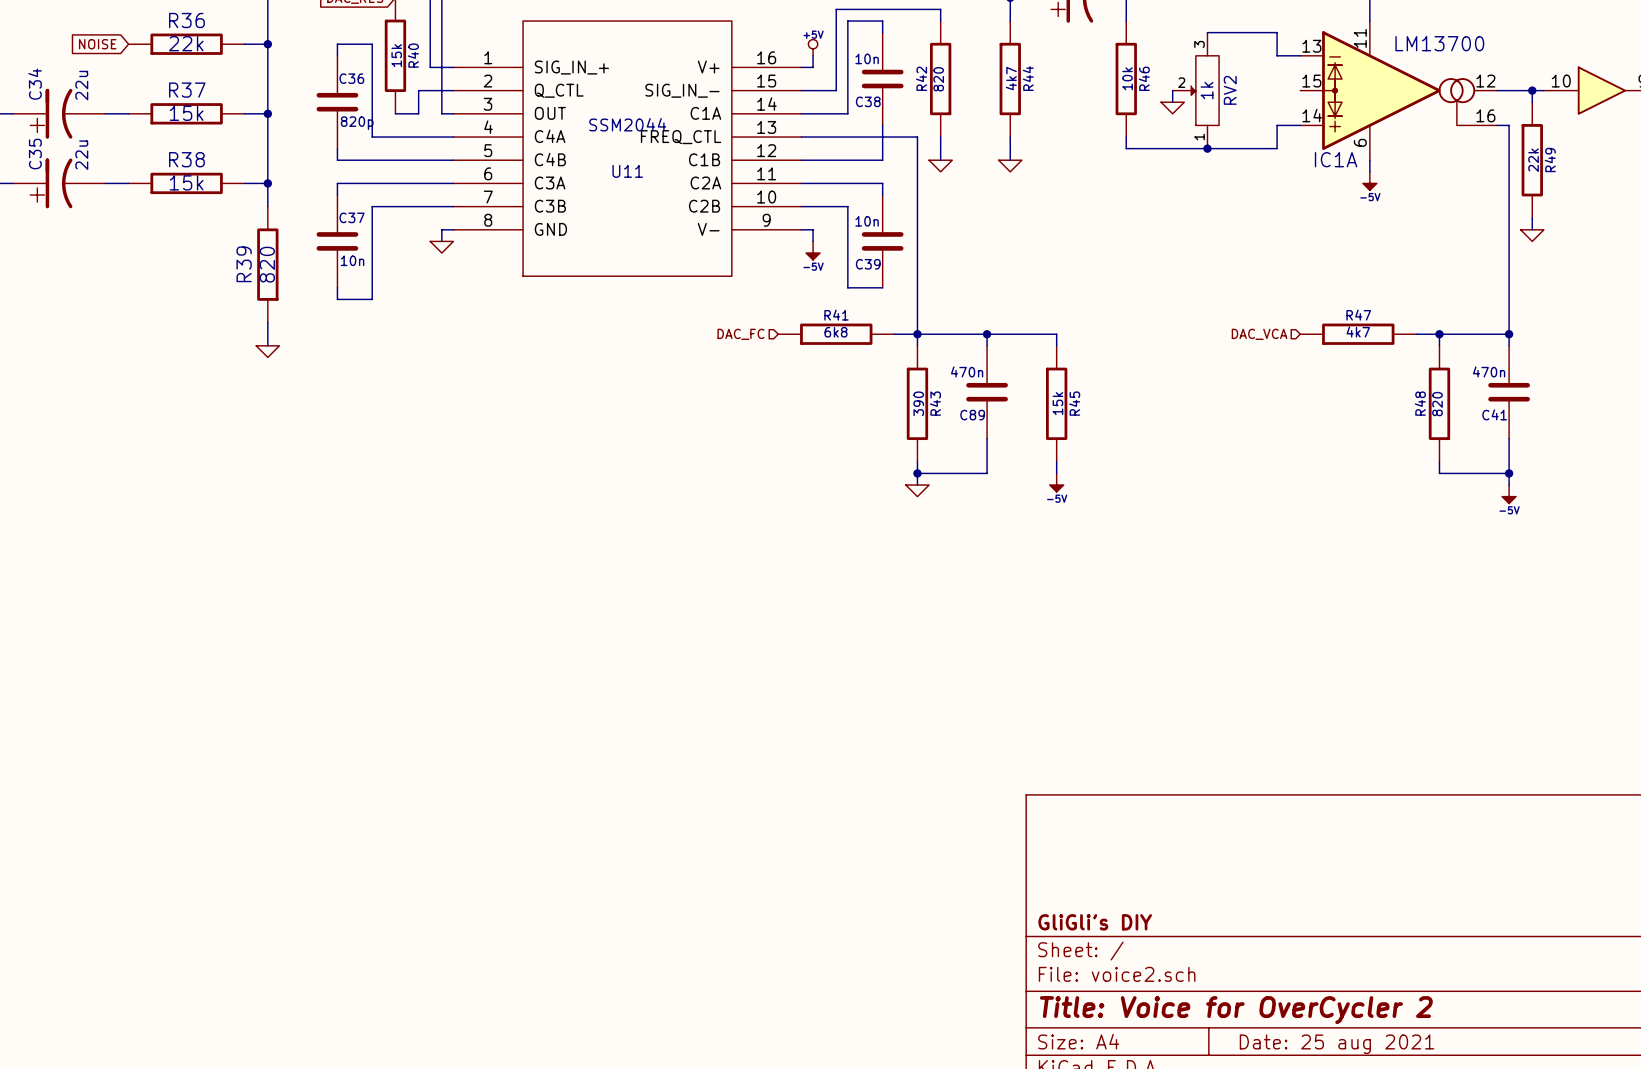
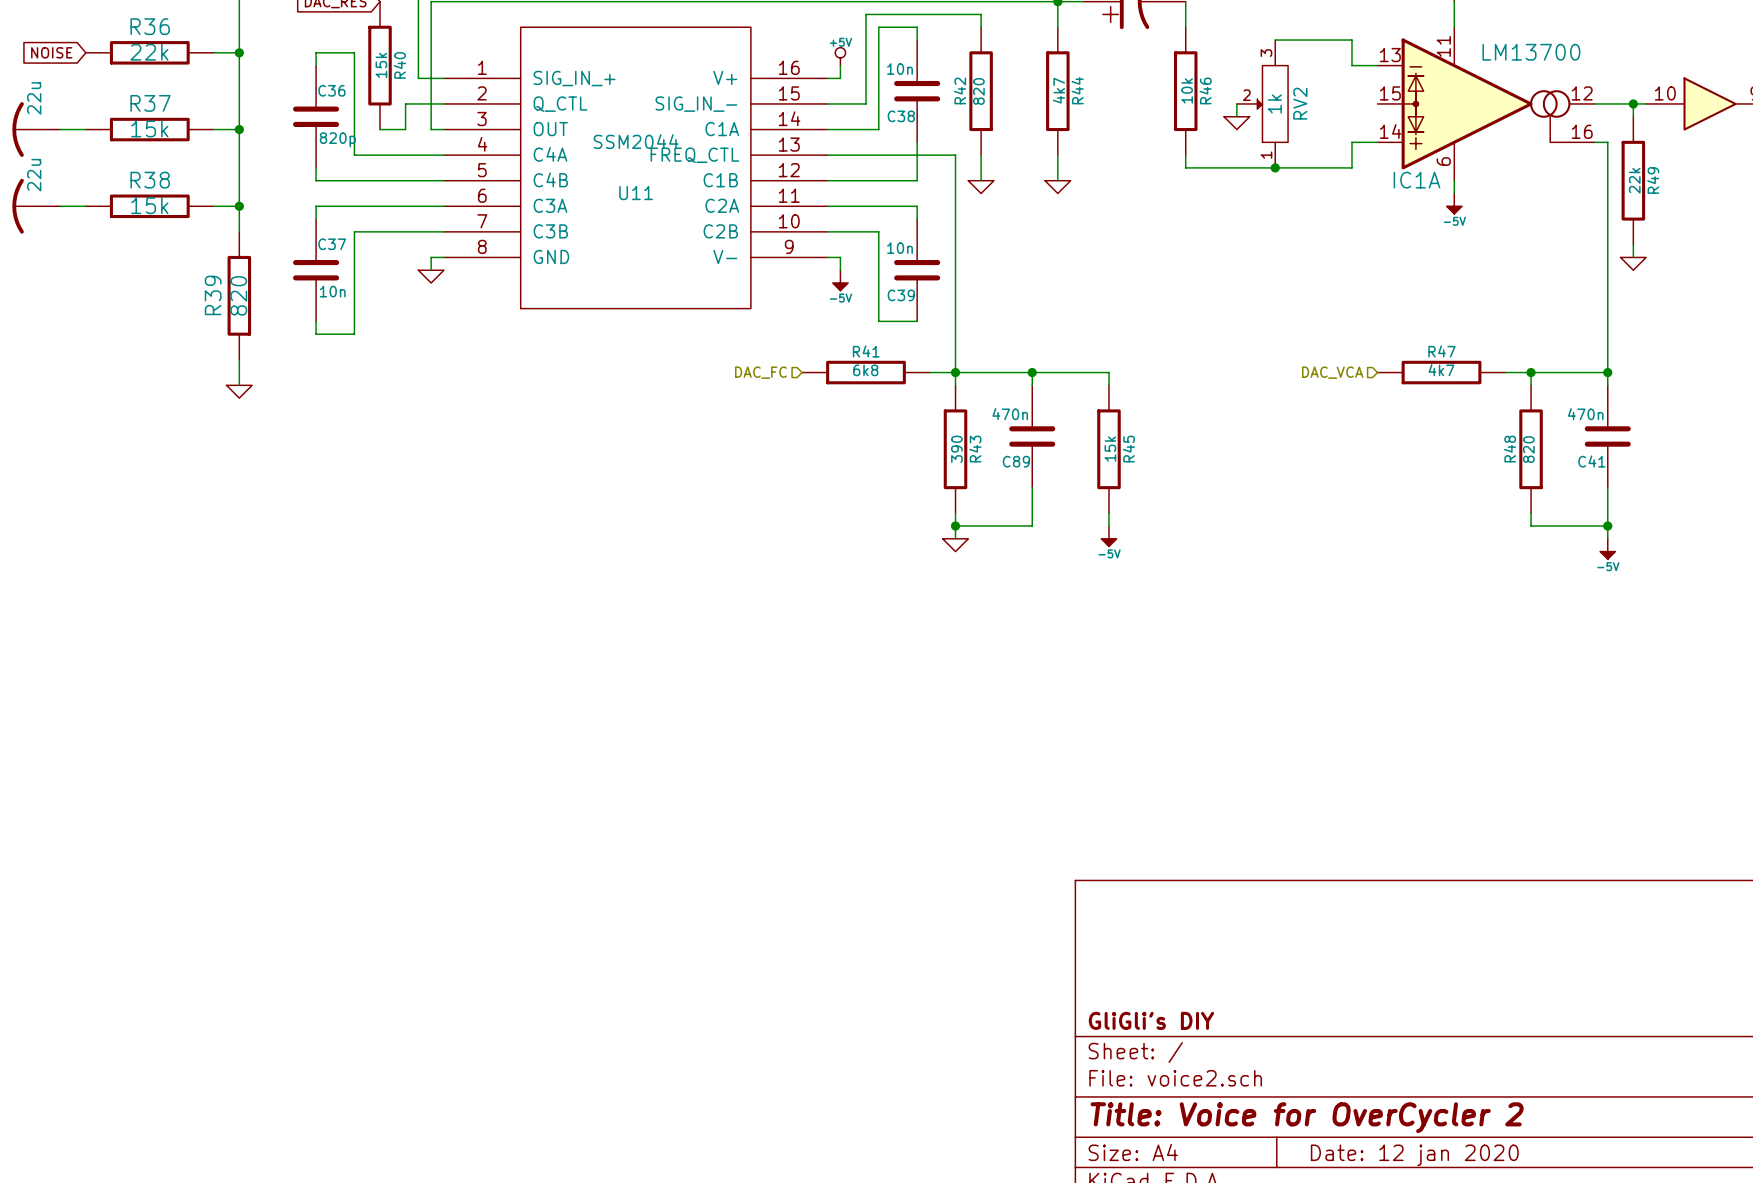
title block: Date: 25 aug 2021 (1337, 1044) -> Date: 12 jan 2020 (1414, 1155)

